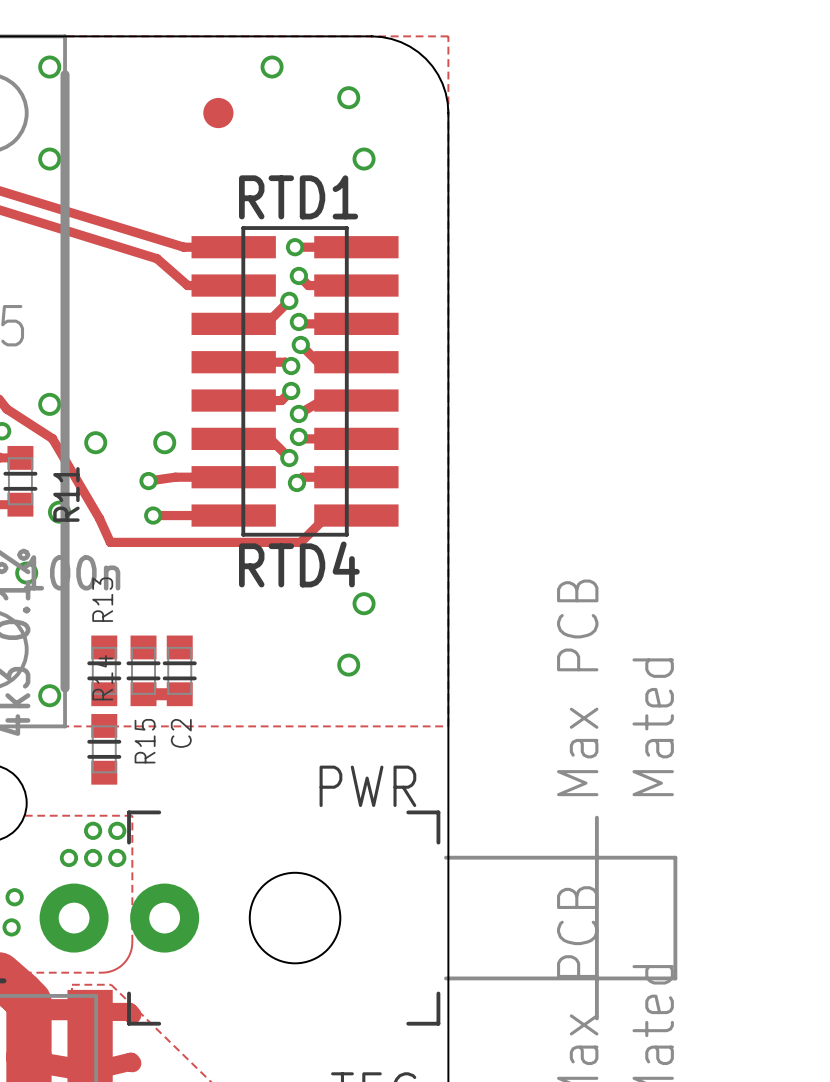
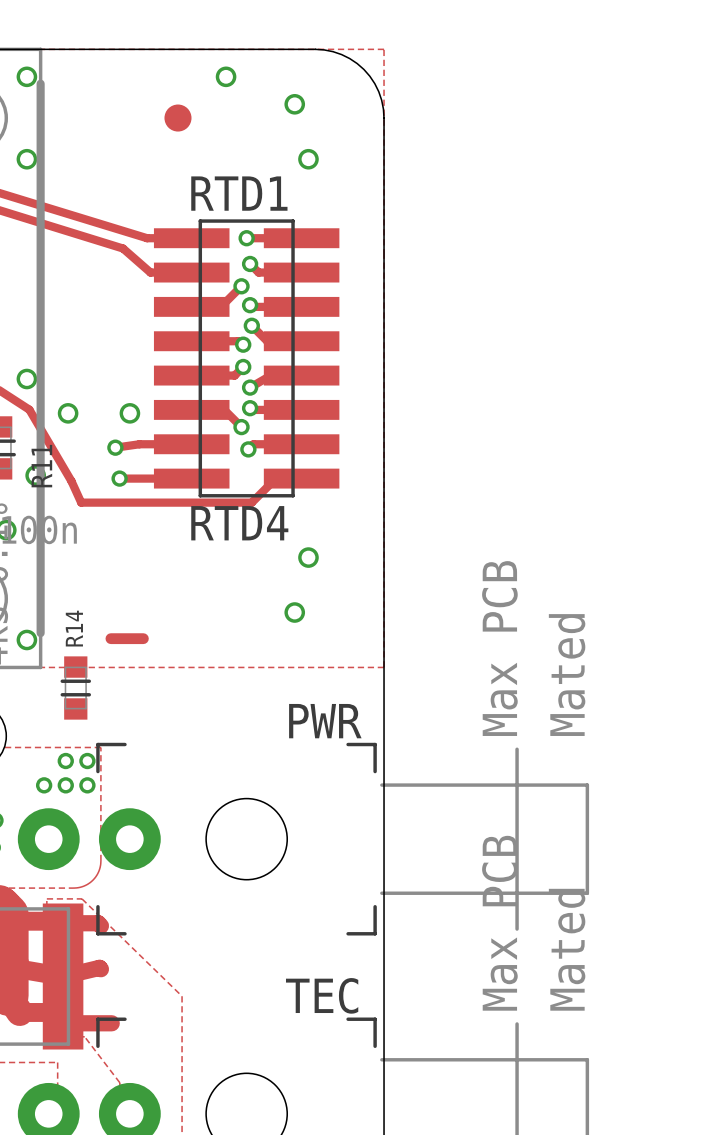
R13: (104, 670) -> none
R15: (143, 670) -> none
C2: (179, 670) -> none

